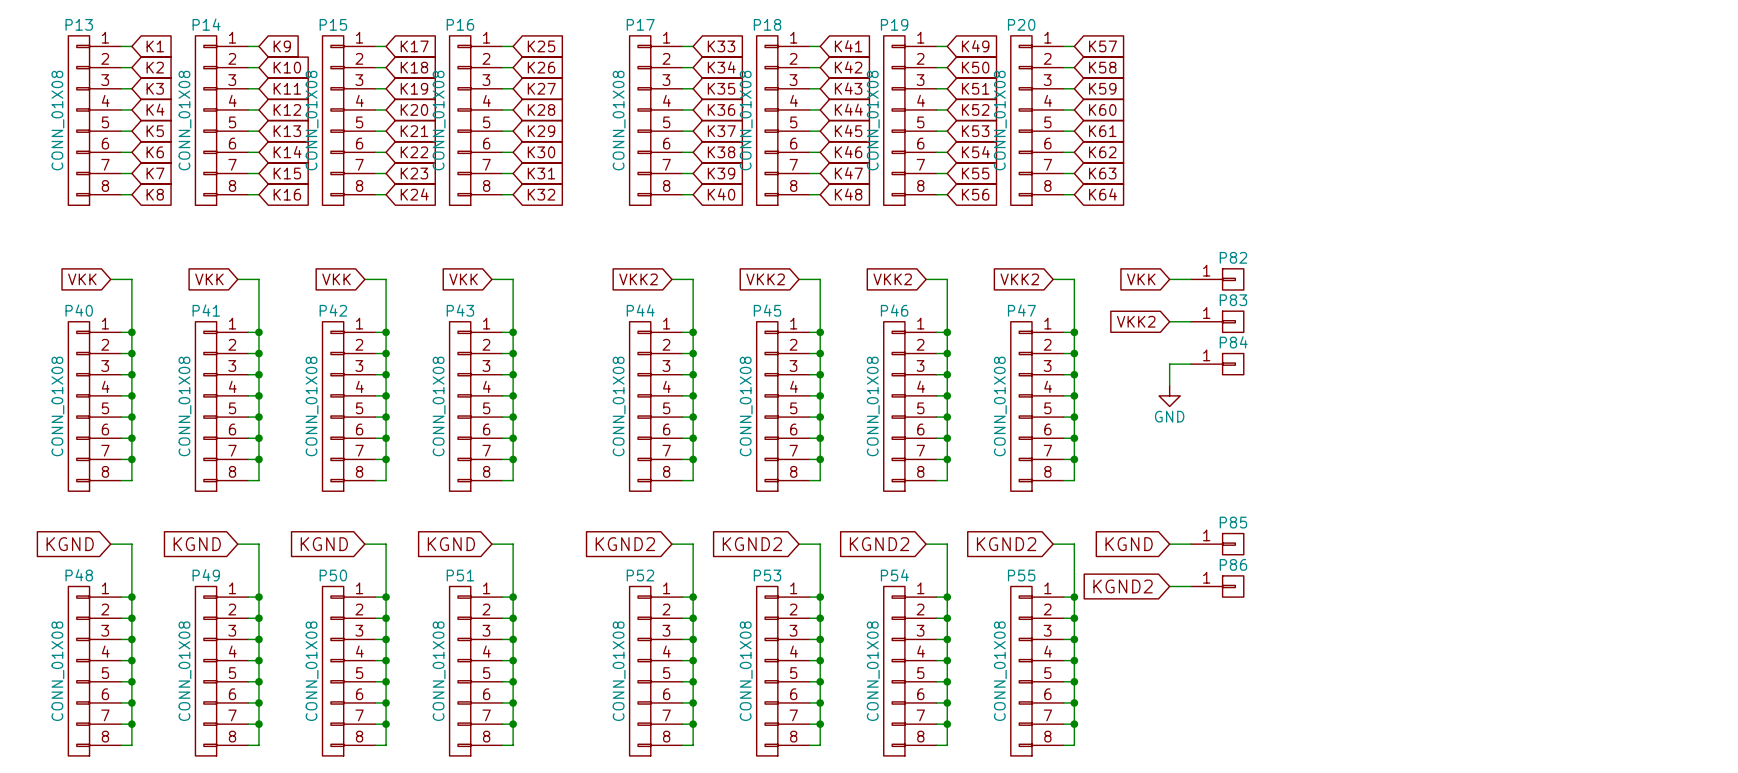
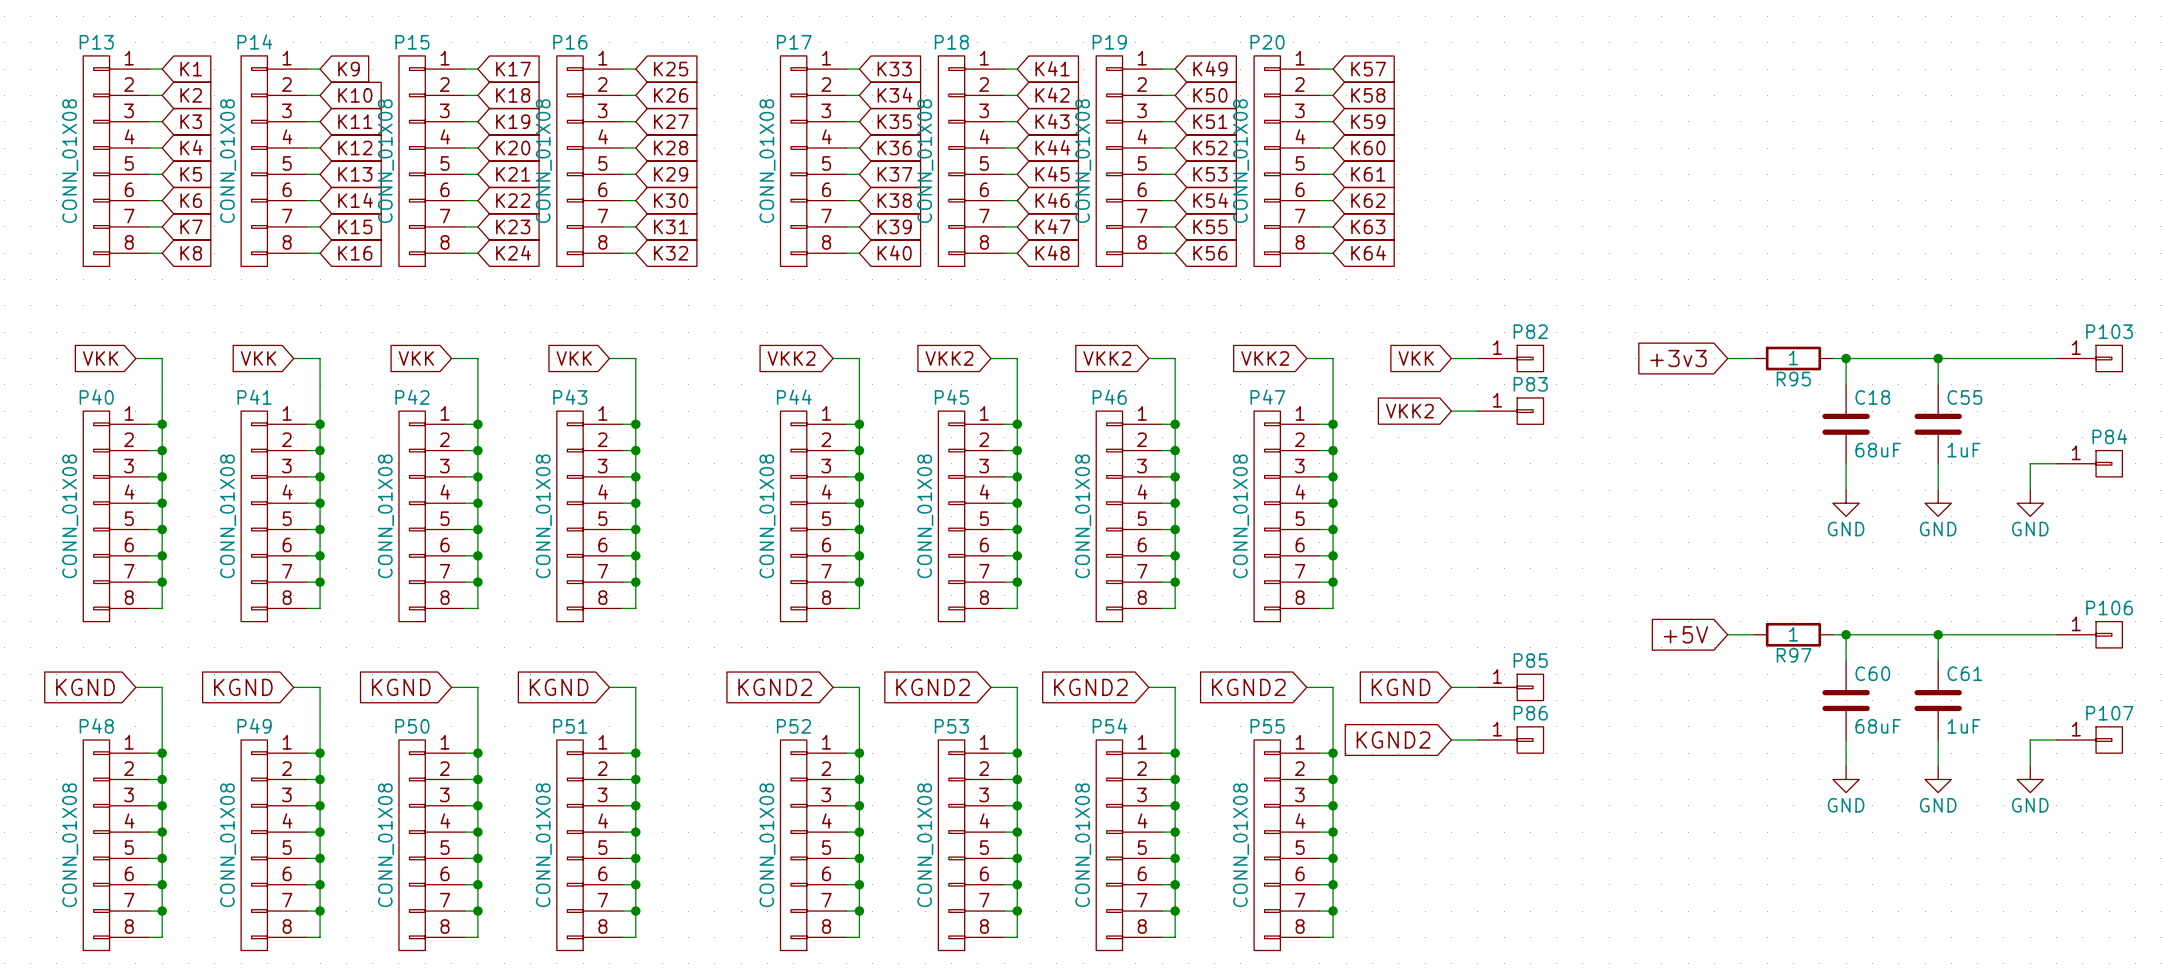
global label: none -> +3v3 (1678, 358)
wire: none -> (1727, 358) (1754, 358)
R95: none -> 1 (1793, 358)
wire: none -> (1832, 358) (2056, 358)
wire: none -> (1846, 358) (1846, 384)
junction: none -> (1846, 358)
wire: none -> (1938, 358) (1938, 384)
junction: none -> (1938, 358)
P103: none -> (2089, 358)
C18: none -> 68uF (1846, 424)
C55: none -> 1uF (1938, 424)
wire: (1190, 364) (1169, 364) (1169, 385) -> none
P84 position: (1217, 364) -> (2089, 463)
wire: none -> (1846, 463) (1846, 490)
wire: none -> (1938, 463) (1938, 490)
wire: none -> (2056, 463) (2030, 463) (2030, 490)
power symbol: GND (1169, 395) -> none
power symbol: none -> GND (1846, 503)
power symbol: none -> GND (1938, 503)
power symbol: none -> GND (2030, 503)
global label: none -> +5V (1685, 634)
wire: none -> (1727, 634) (1754, 634)
R97: none -> 1 (1793, 634)
wire: none -> (1832, 634) (2056, 634)
wire: none -> (1846, 634) (1846, 661)
junction: none -> (1846, 634)
wire: none -> (1938, 634) (1938, 661)
junction: none -> (1938, 634)
P106: none -> (2089, 634)
C60: none -> 68uF (1846, 700)
C61: none -> 1uF (1938, 700)
wire: none -> (1846, 740) (1846, 766)
wire: none -> (1938, 740) (1938, 766)
wire: none -> (2056, 740) (2030, 740) (2030, 766)
P107: none -> (2089, 740)
power symbol: none -> GND (1846, 779)
power symbol: none -> GND (1938, 779)
power symbol: none -> GND (2030, 779)

